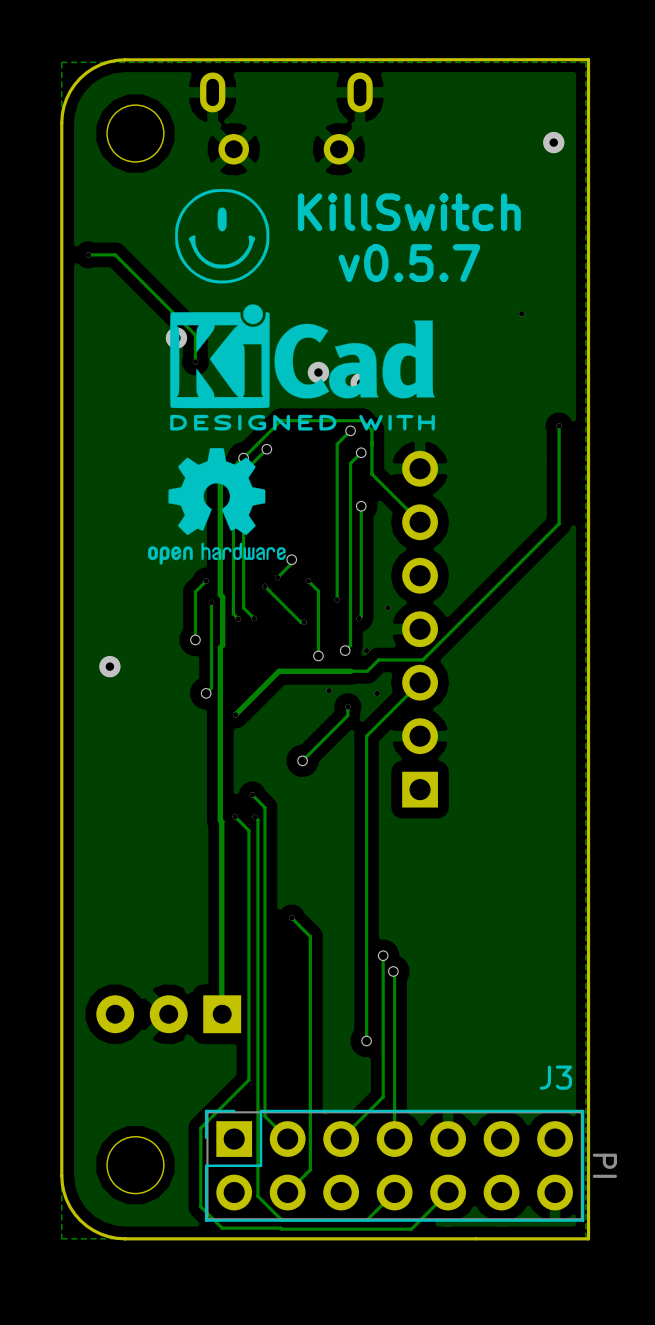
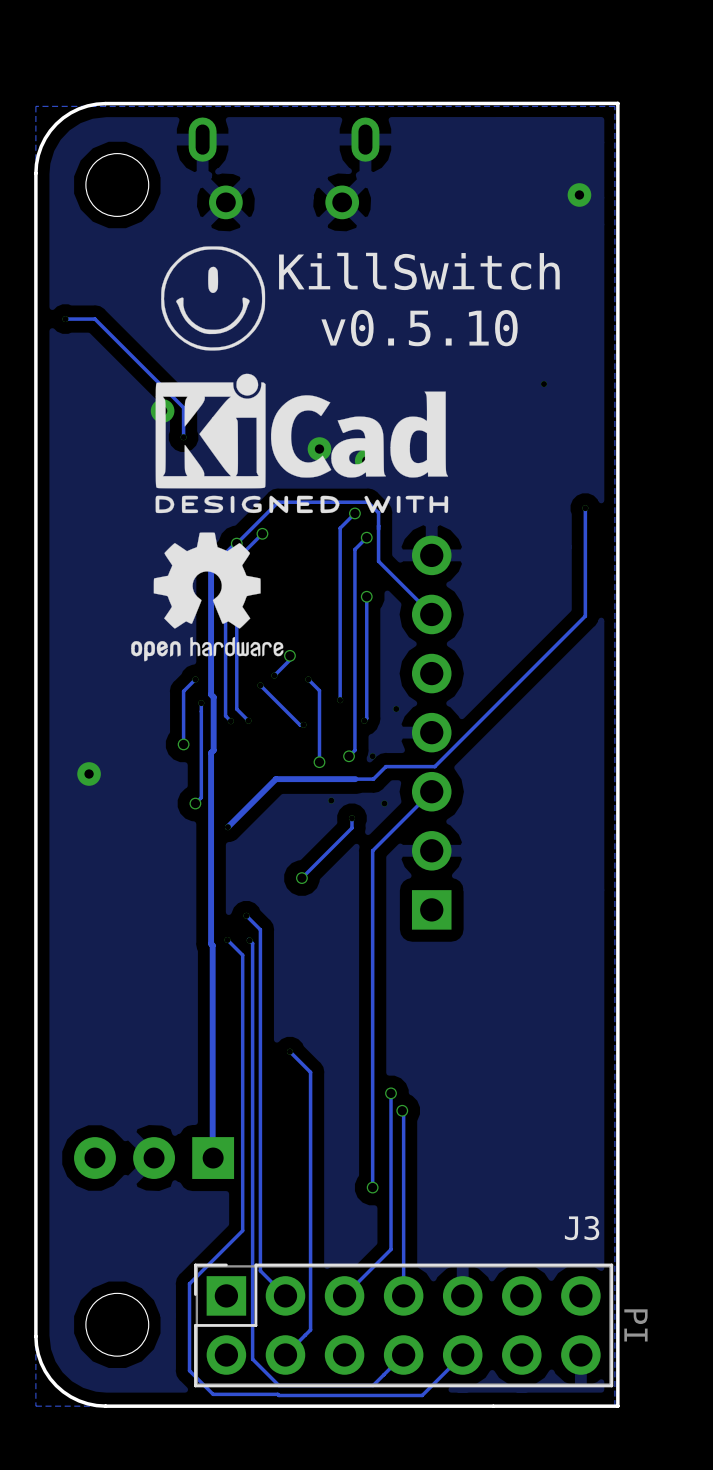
text: v0.5.7 (409, 263) -> v0.5.10 (419, 328)

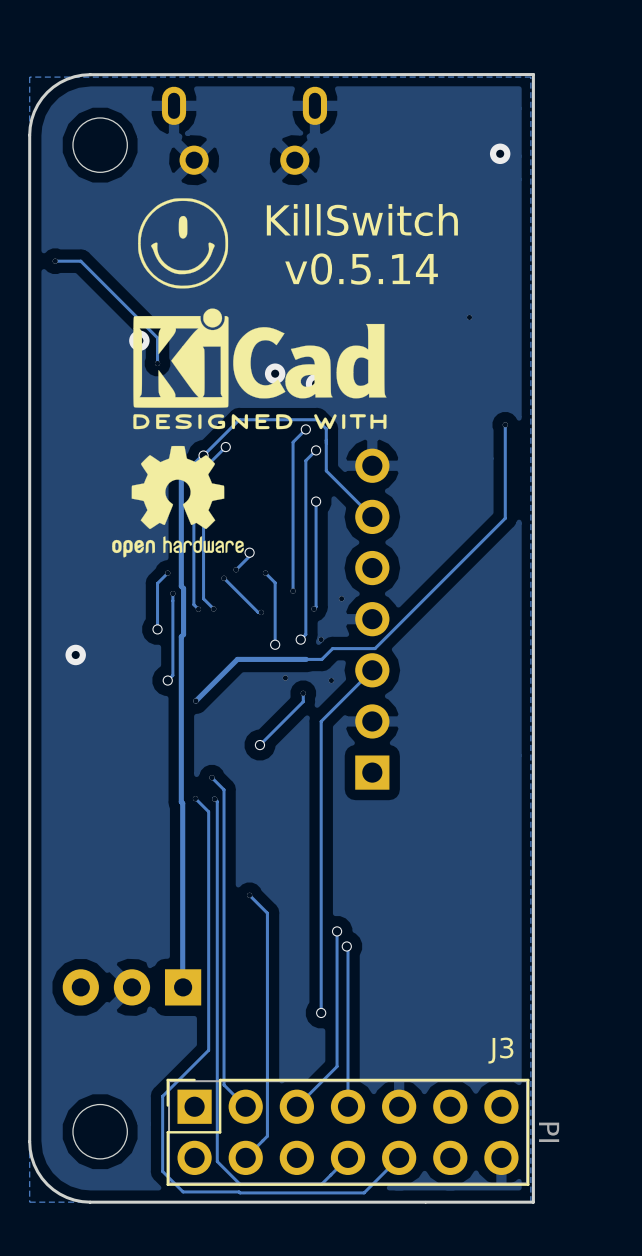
text: v0.5.10 (419, 328) -> v0.5.14 (361, 269)

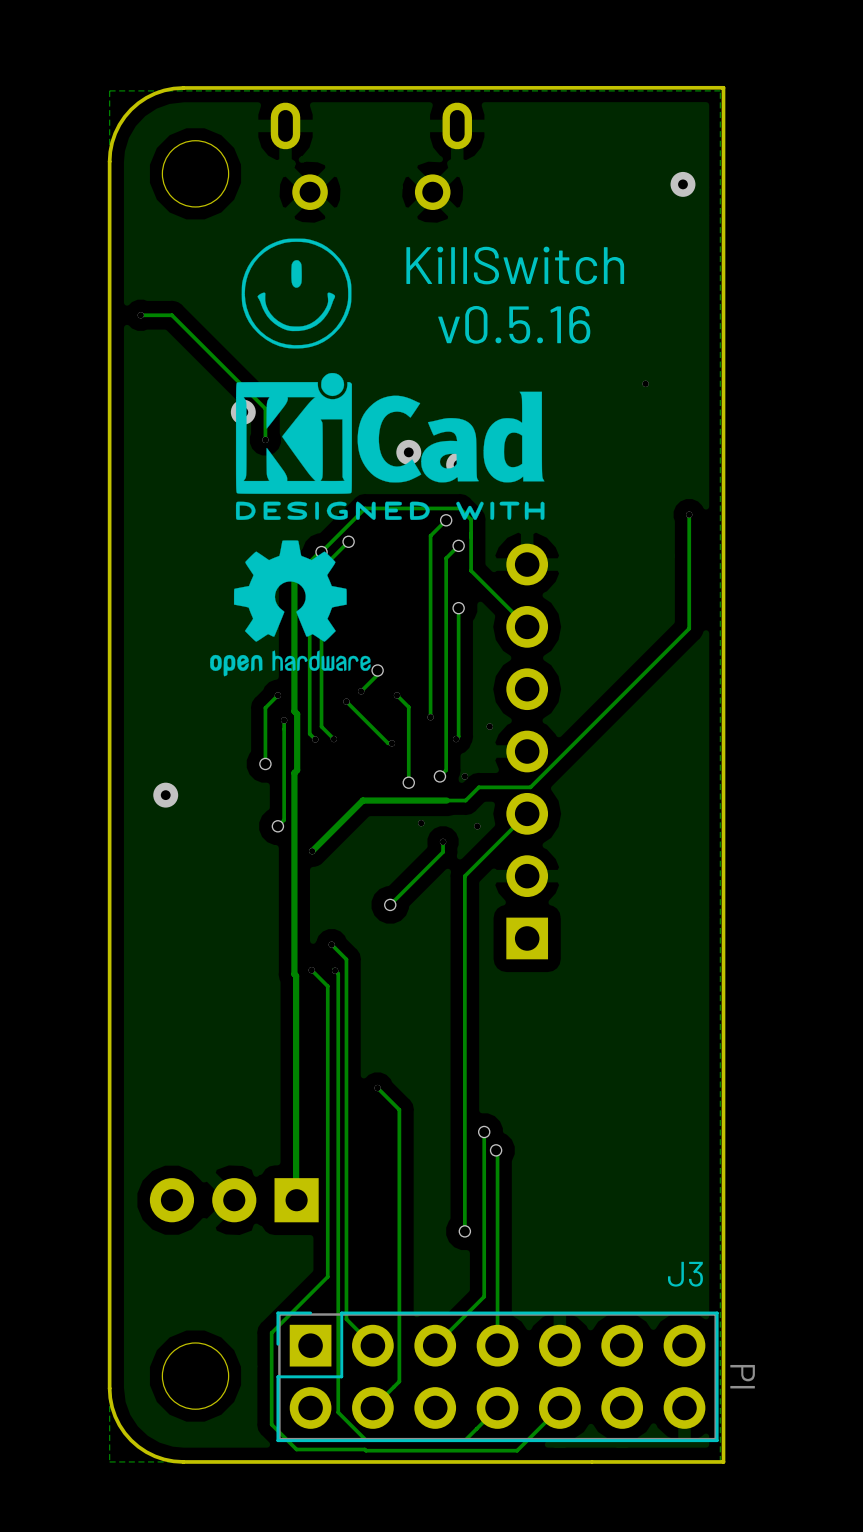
text: v0.5.14 (361, 269) -> v0.5.16 (514, 324)

